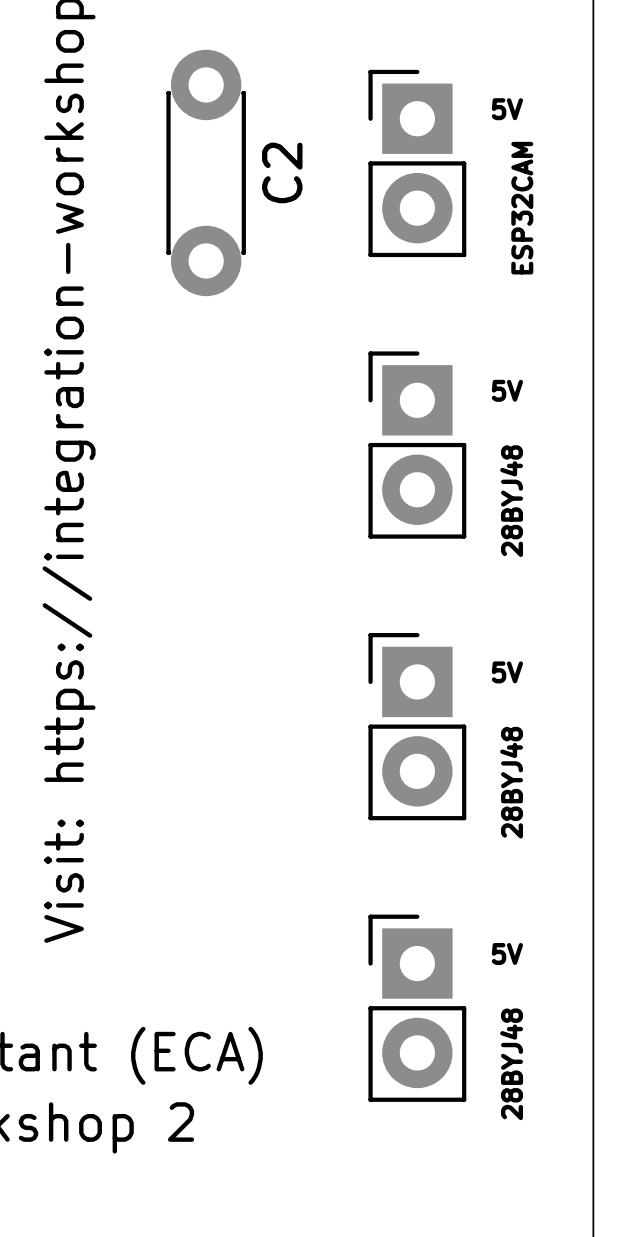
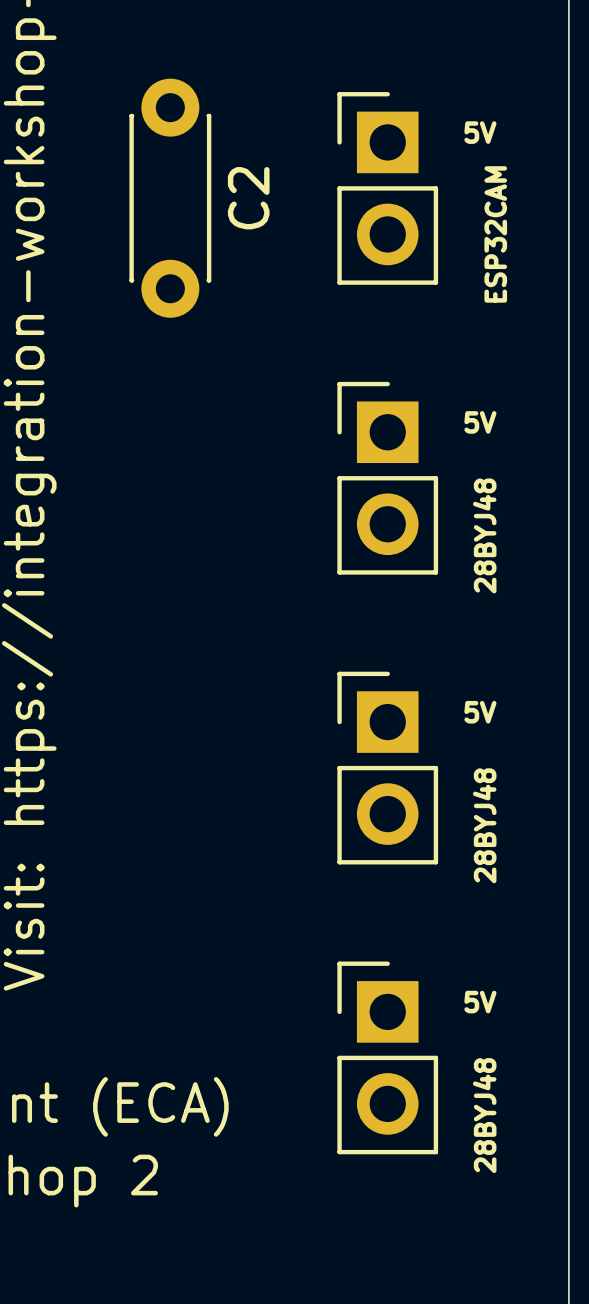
C2 footprint: [166, 49, 246, 297] -> [129, 78, 212, 318]
part footprint: [368, 69, 467, 258] -> [337, 92, 439, 285]
part footprint: [368, 351, 467, 539] -> [337, 381, 439, 575]
part footprint: [368, 633, 467, 821] -> [337, 671, 439, 865]
part footprint: [368, 914, 467, 1102] -> [337, 961, 439, 1155]

